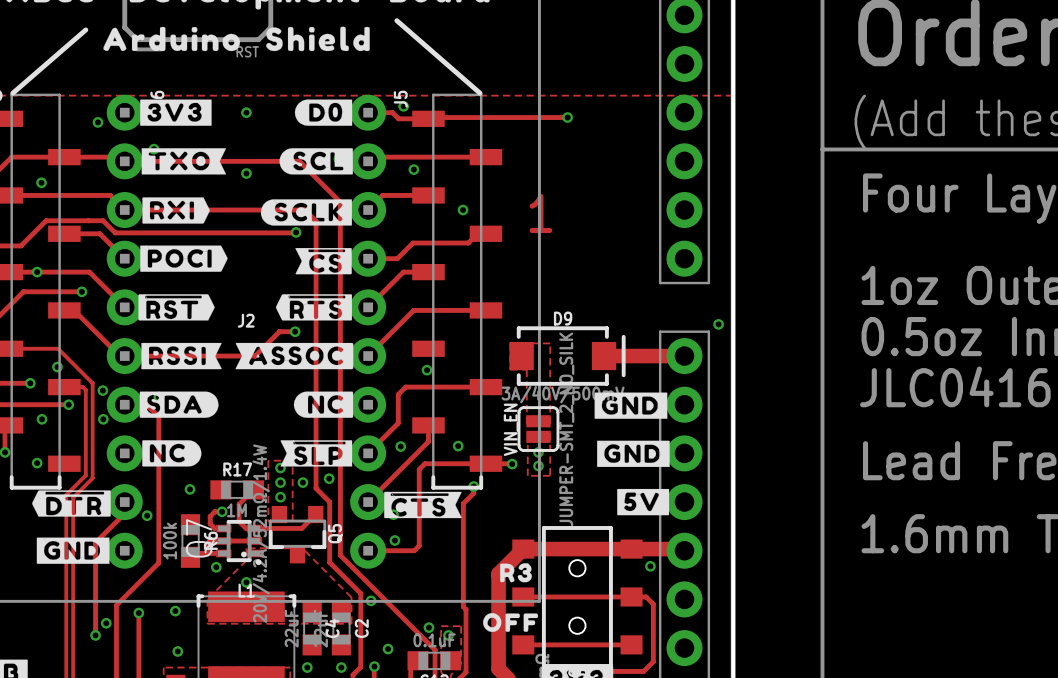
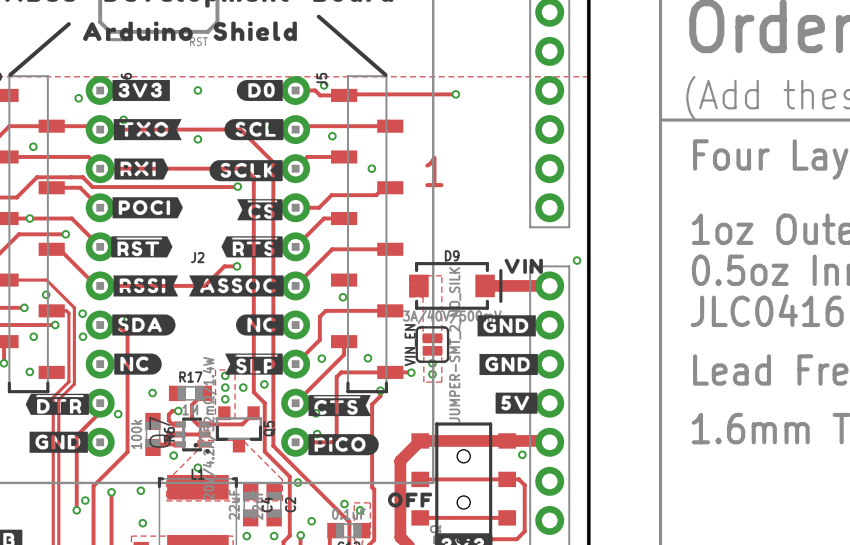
drawing: none -> [504, 258, 543, 274]
drawing: none -> [308, 434, 379, 456]
drawing: [500, 563, 532, 583] -> none

